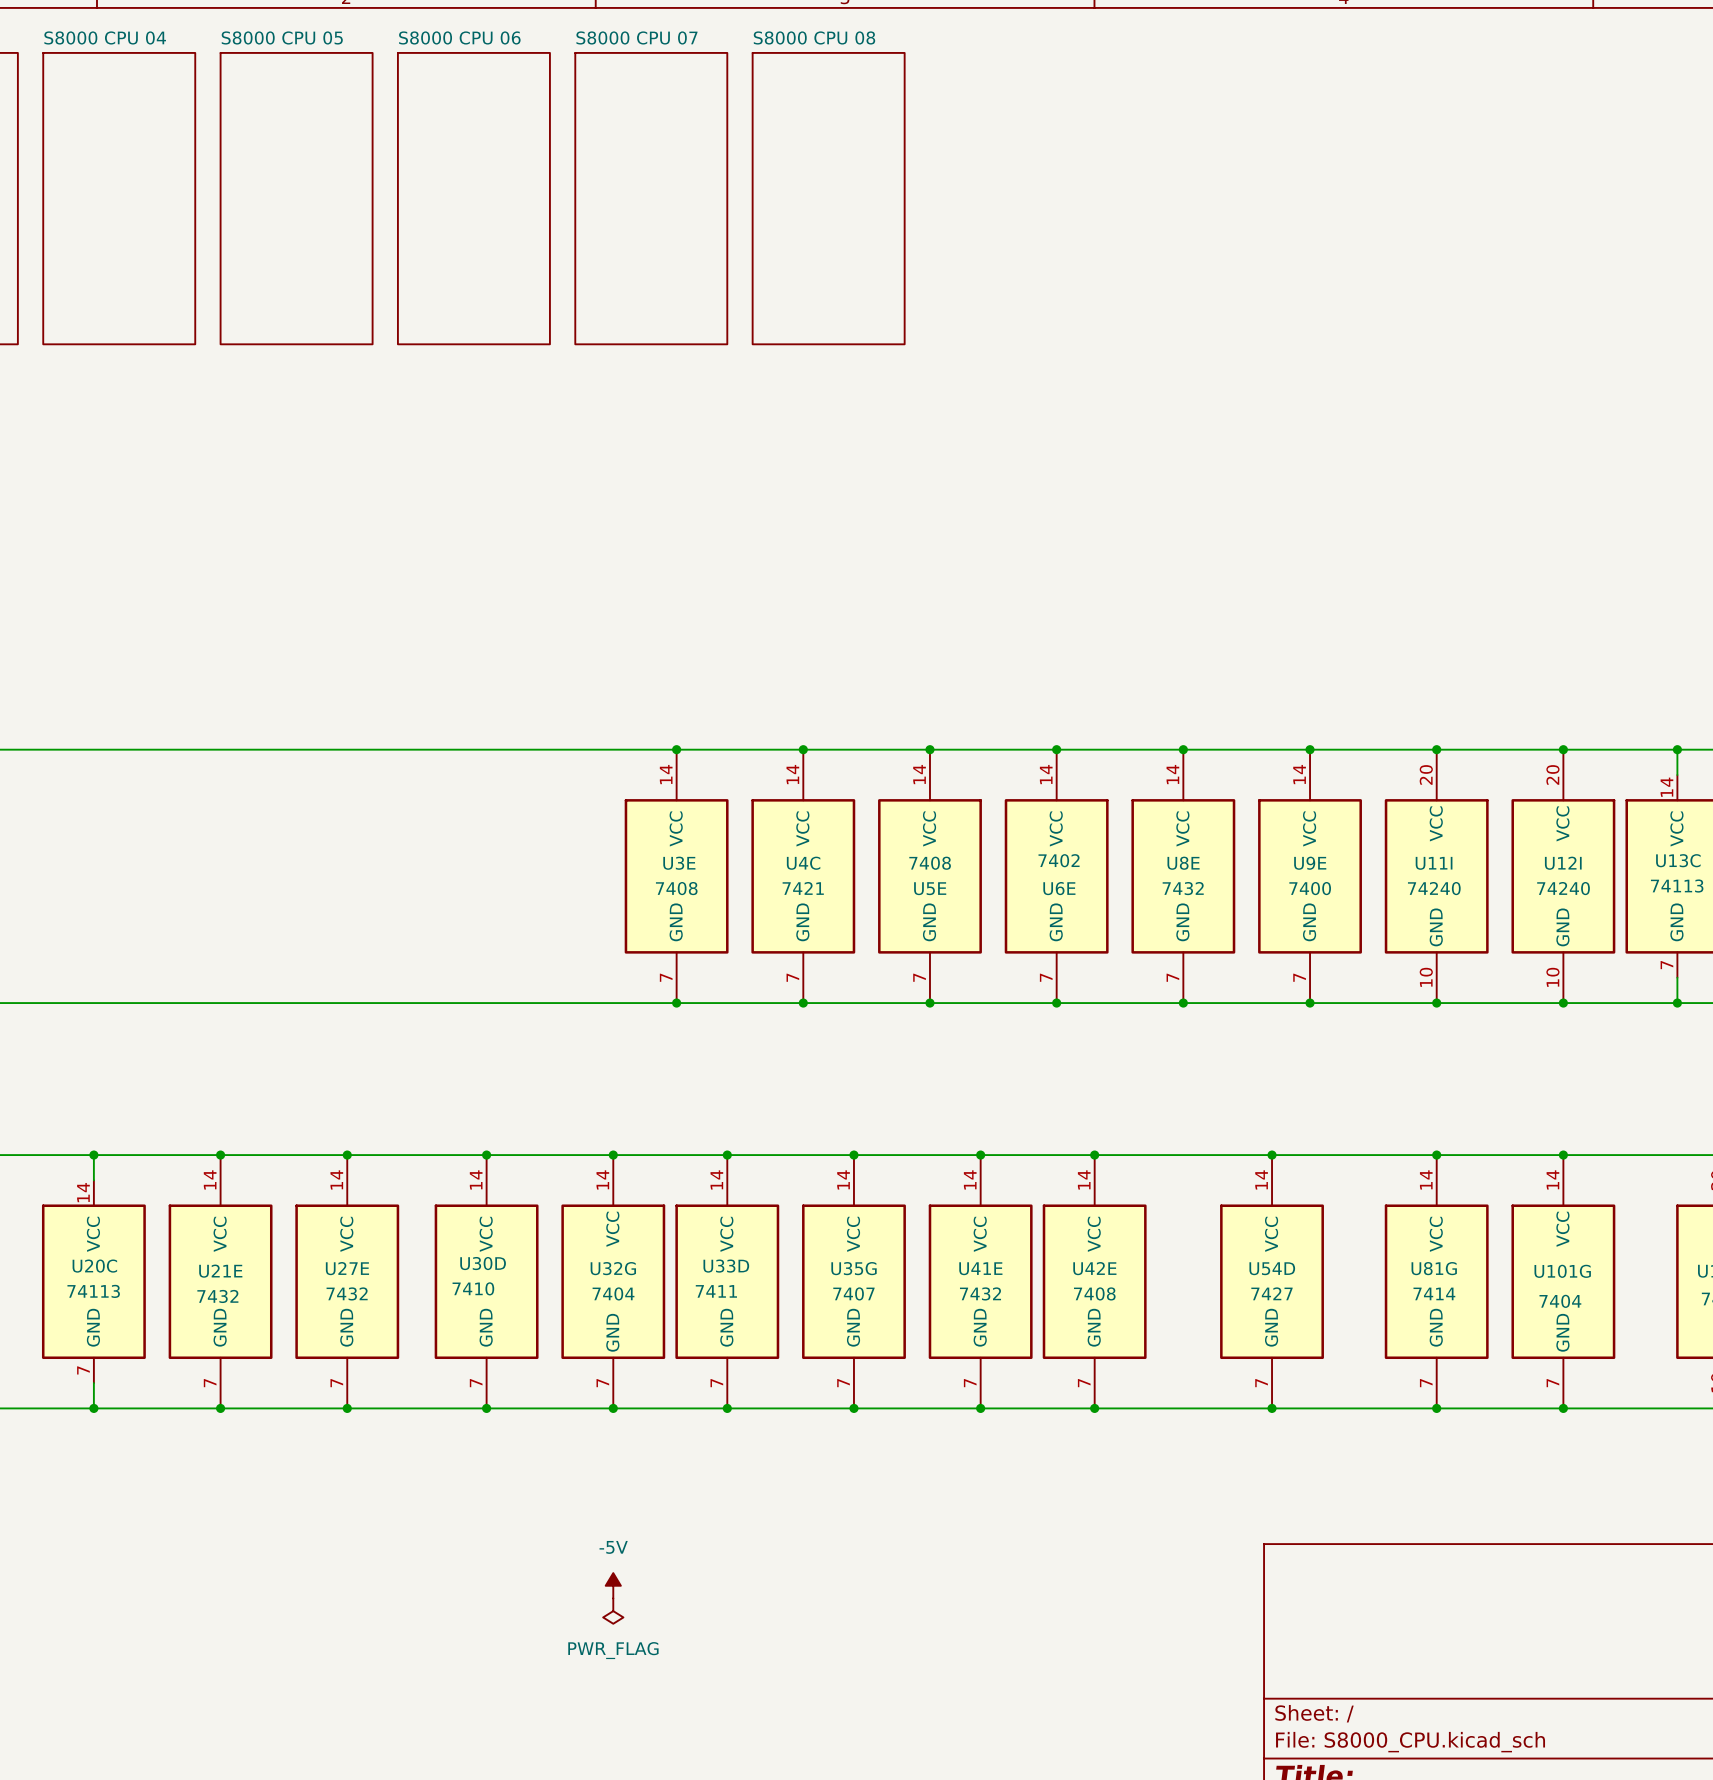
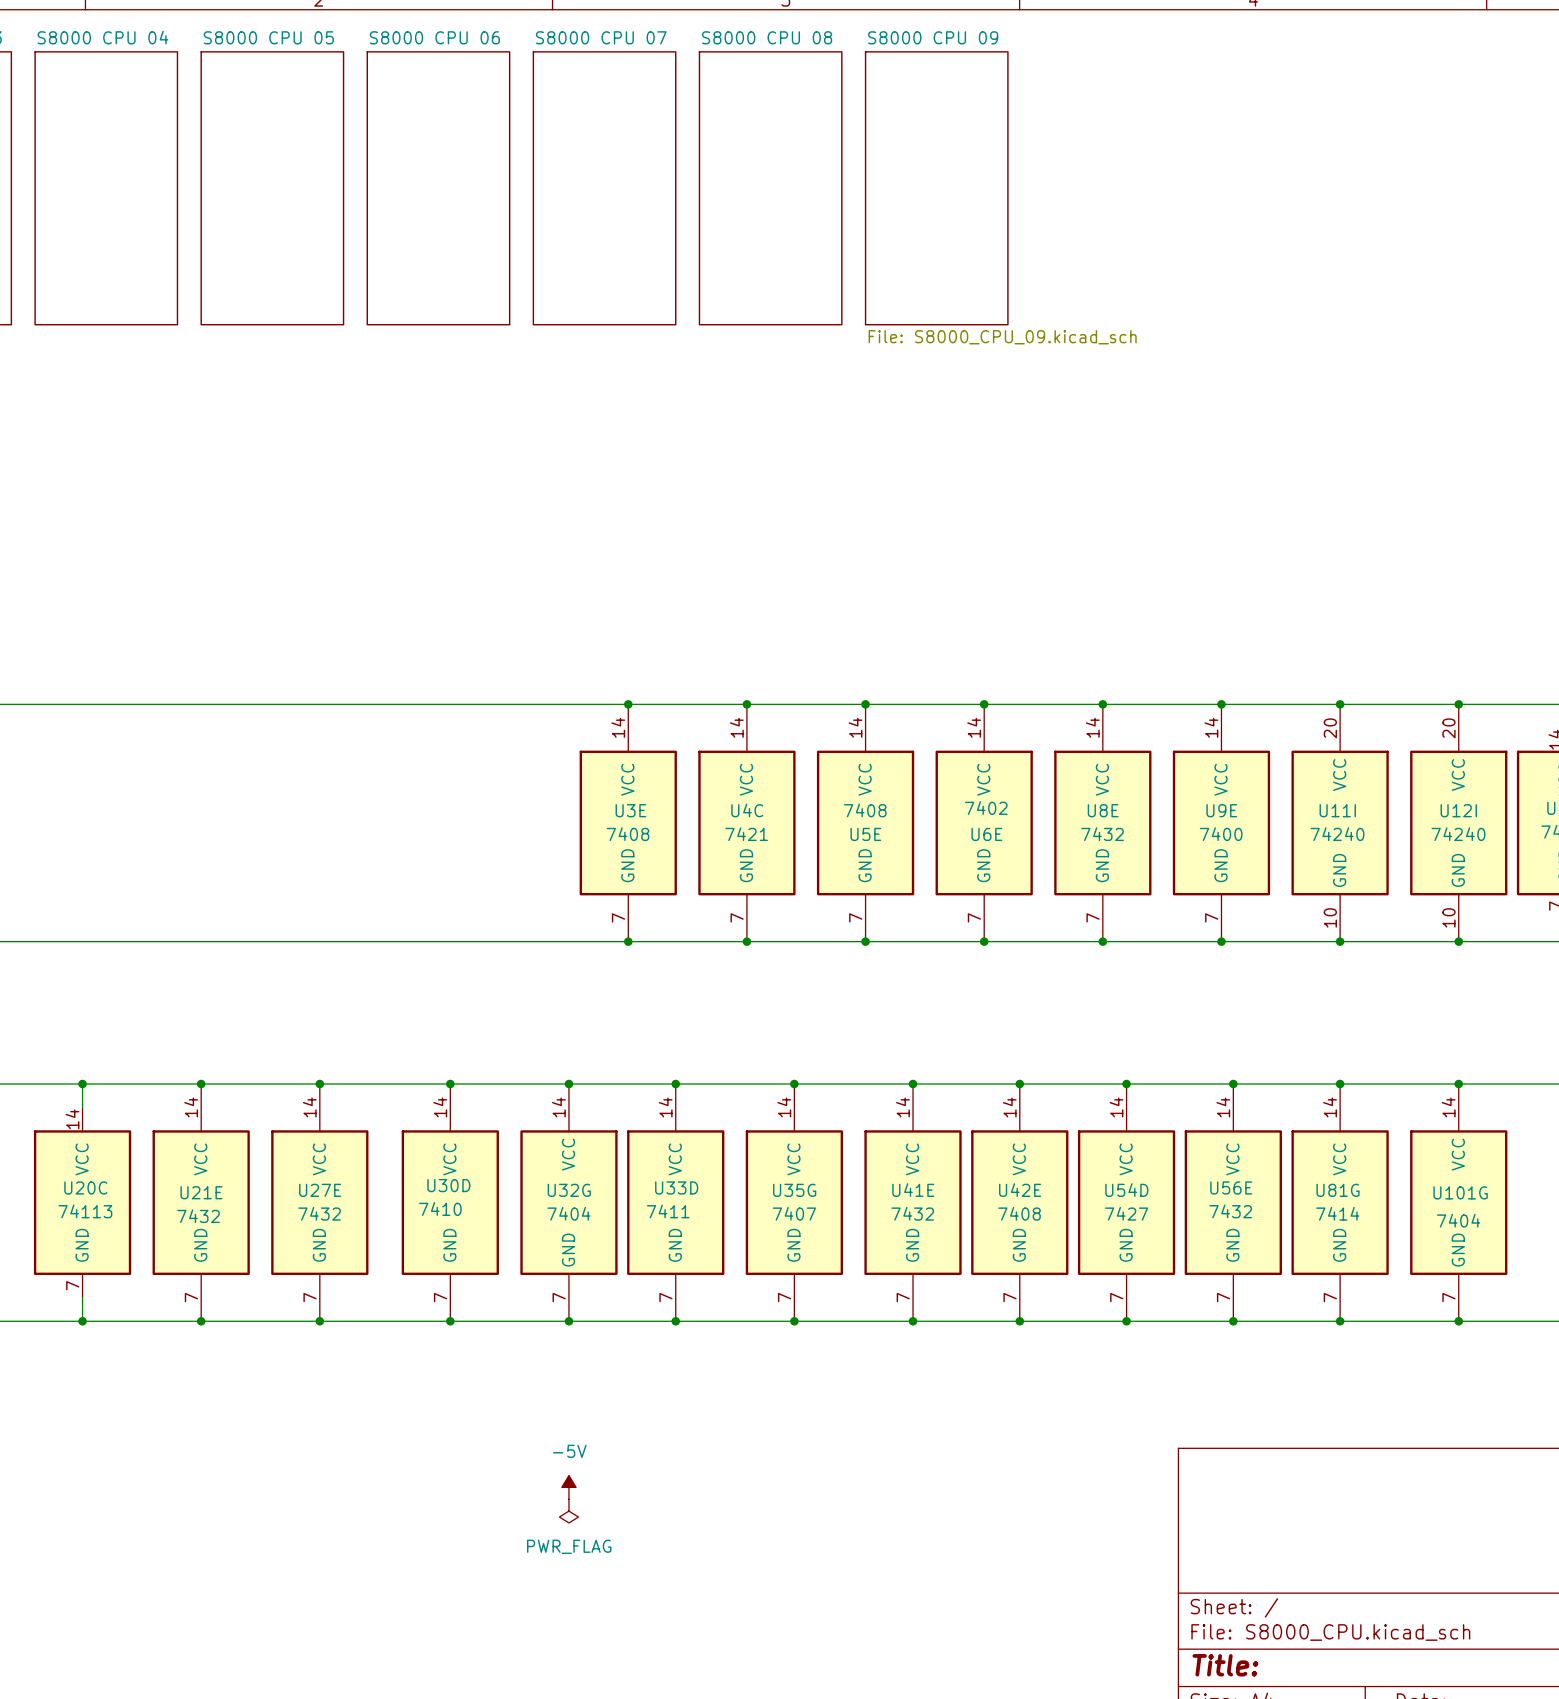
sheet S8000 CPU 09: none -> File: S8000_CPU_09.kicad_sch (936, 188)
junction: none -> (1126, 1084)
junction: (1272, 1155) -> none
junction: none -> (1233, 1084)
U54D position: (1272, 1281) -> (1126, 1202)
U56E: none -> 7432 (1233, 1202)
junction: none -> (1126, 1321)
junction: (1272, 1408) -> none
junction: none -> (1233, 1321)

